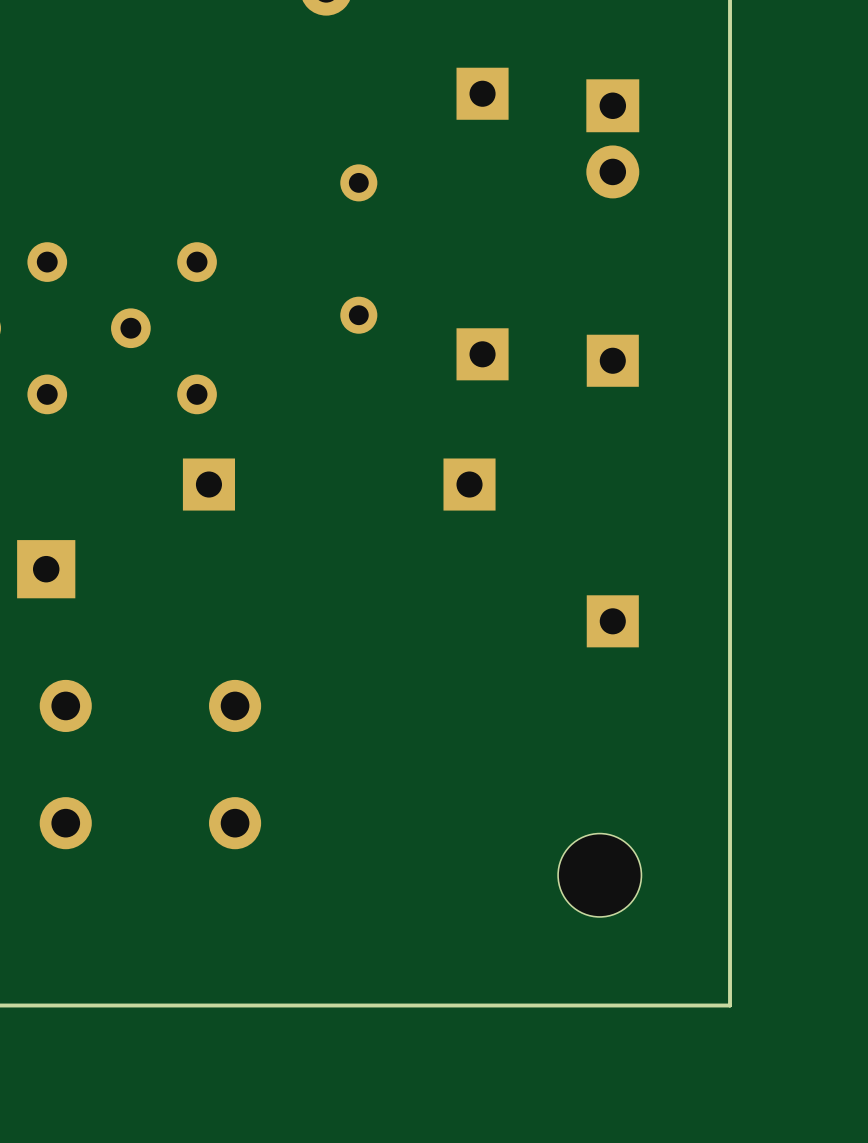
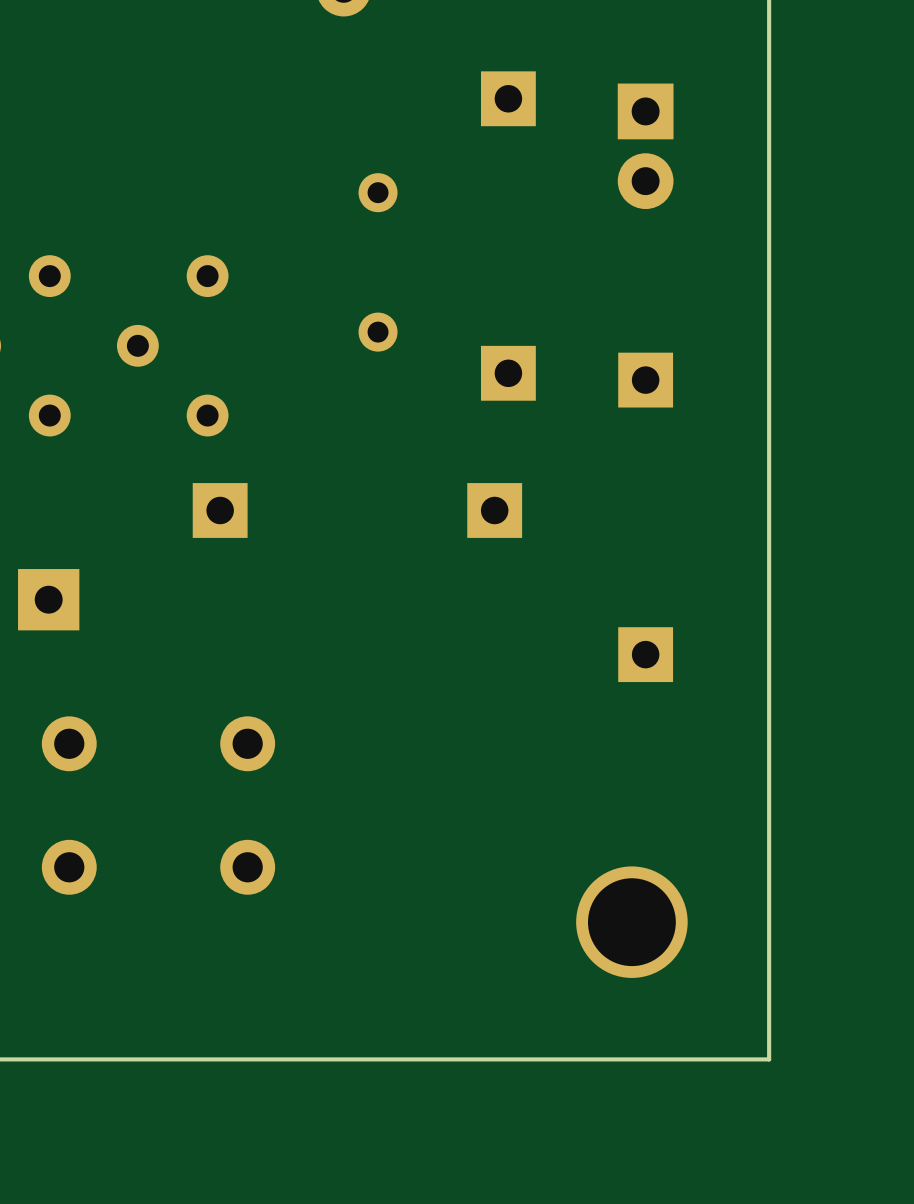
part footprint: [558, 833, 642, 917] -> [576, 866, 688, 978]

